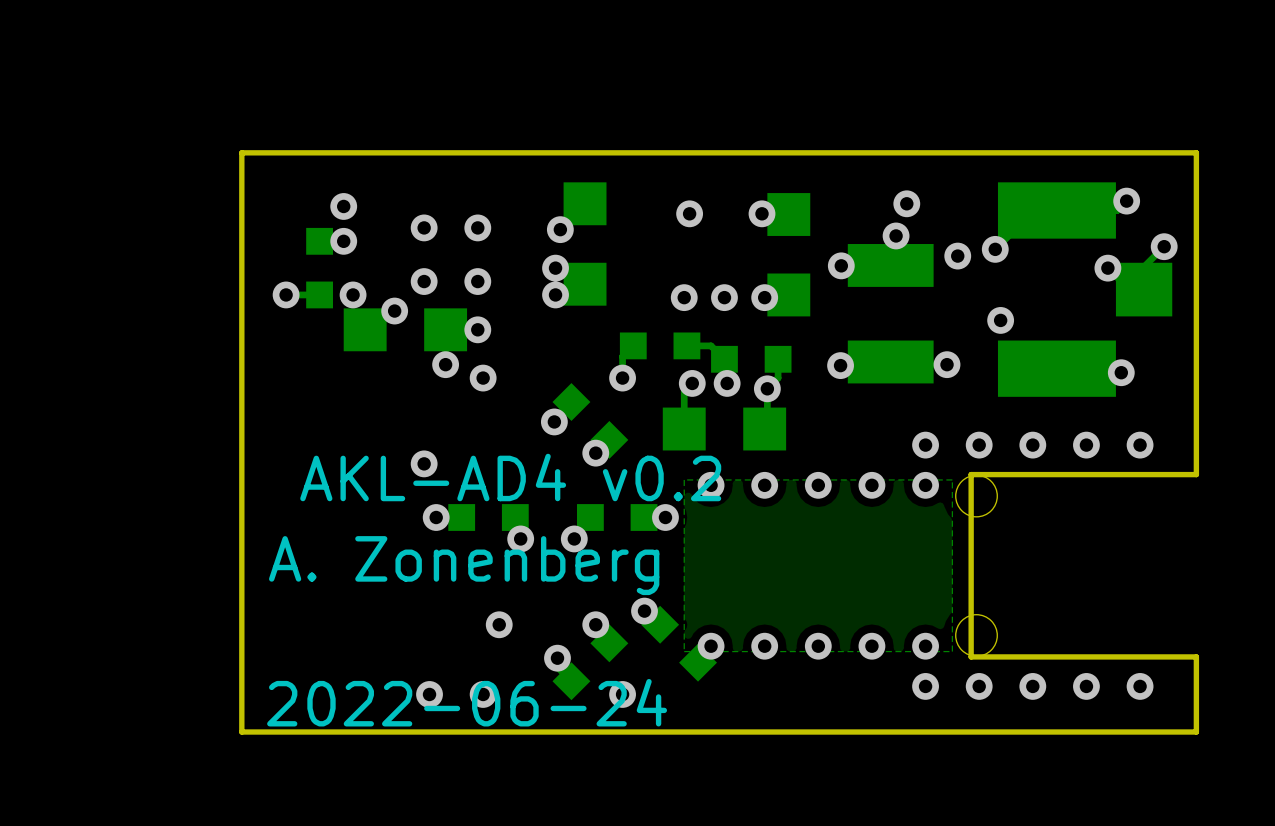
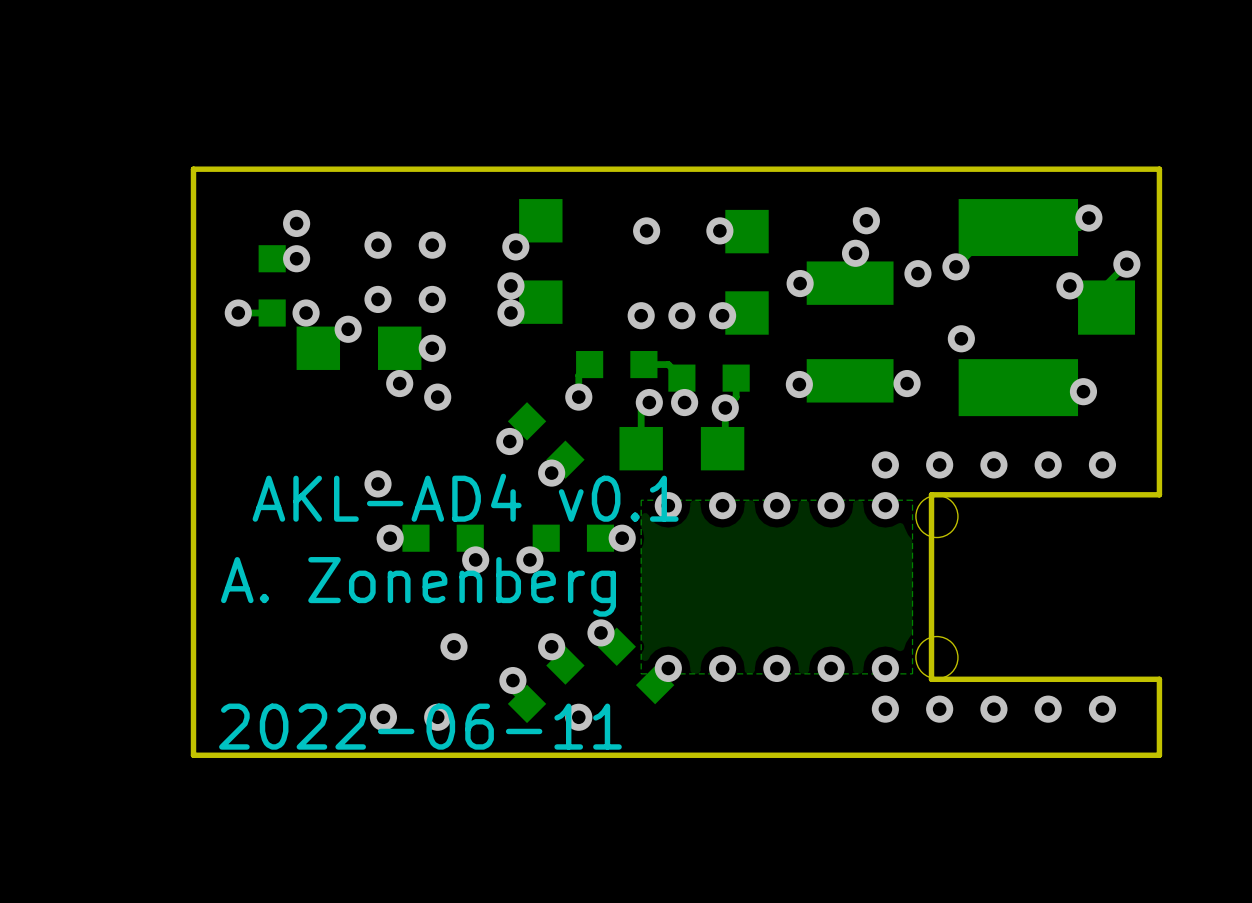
text: AKL-AD4 v0.2 (510, 477) -> AKL-AD4 v0.1 (465, 497)
text: 2022-06-24 (467, 702) -> 2022-06-11 (420, 726)

